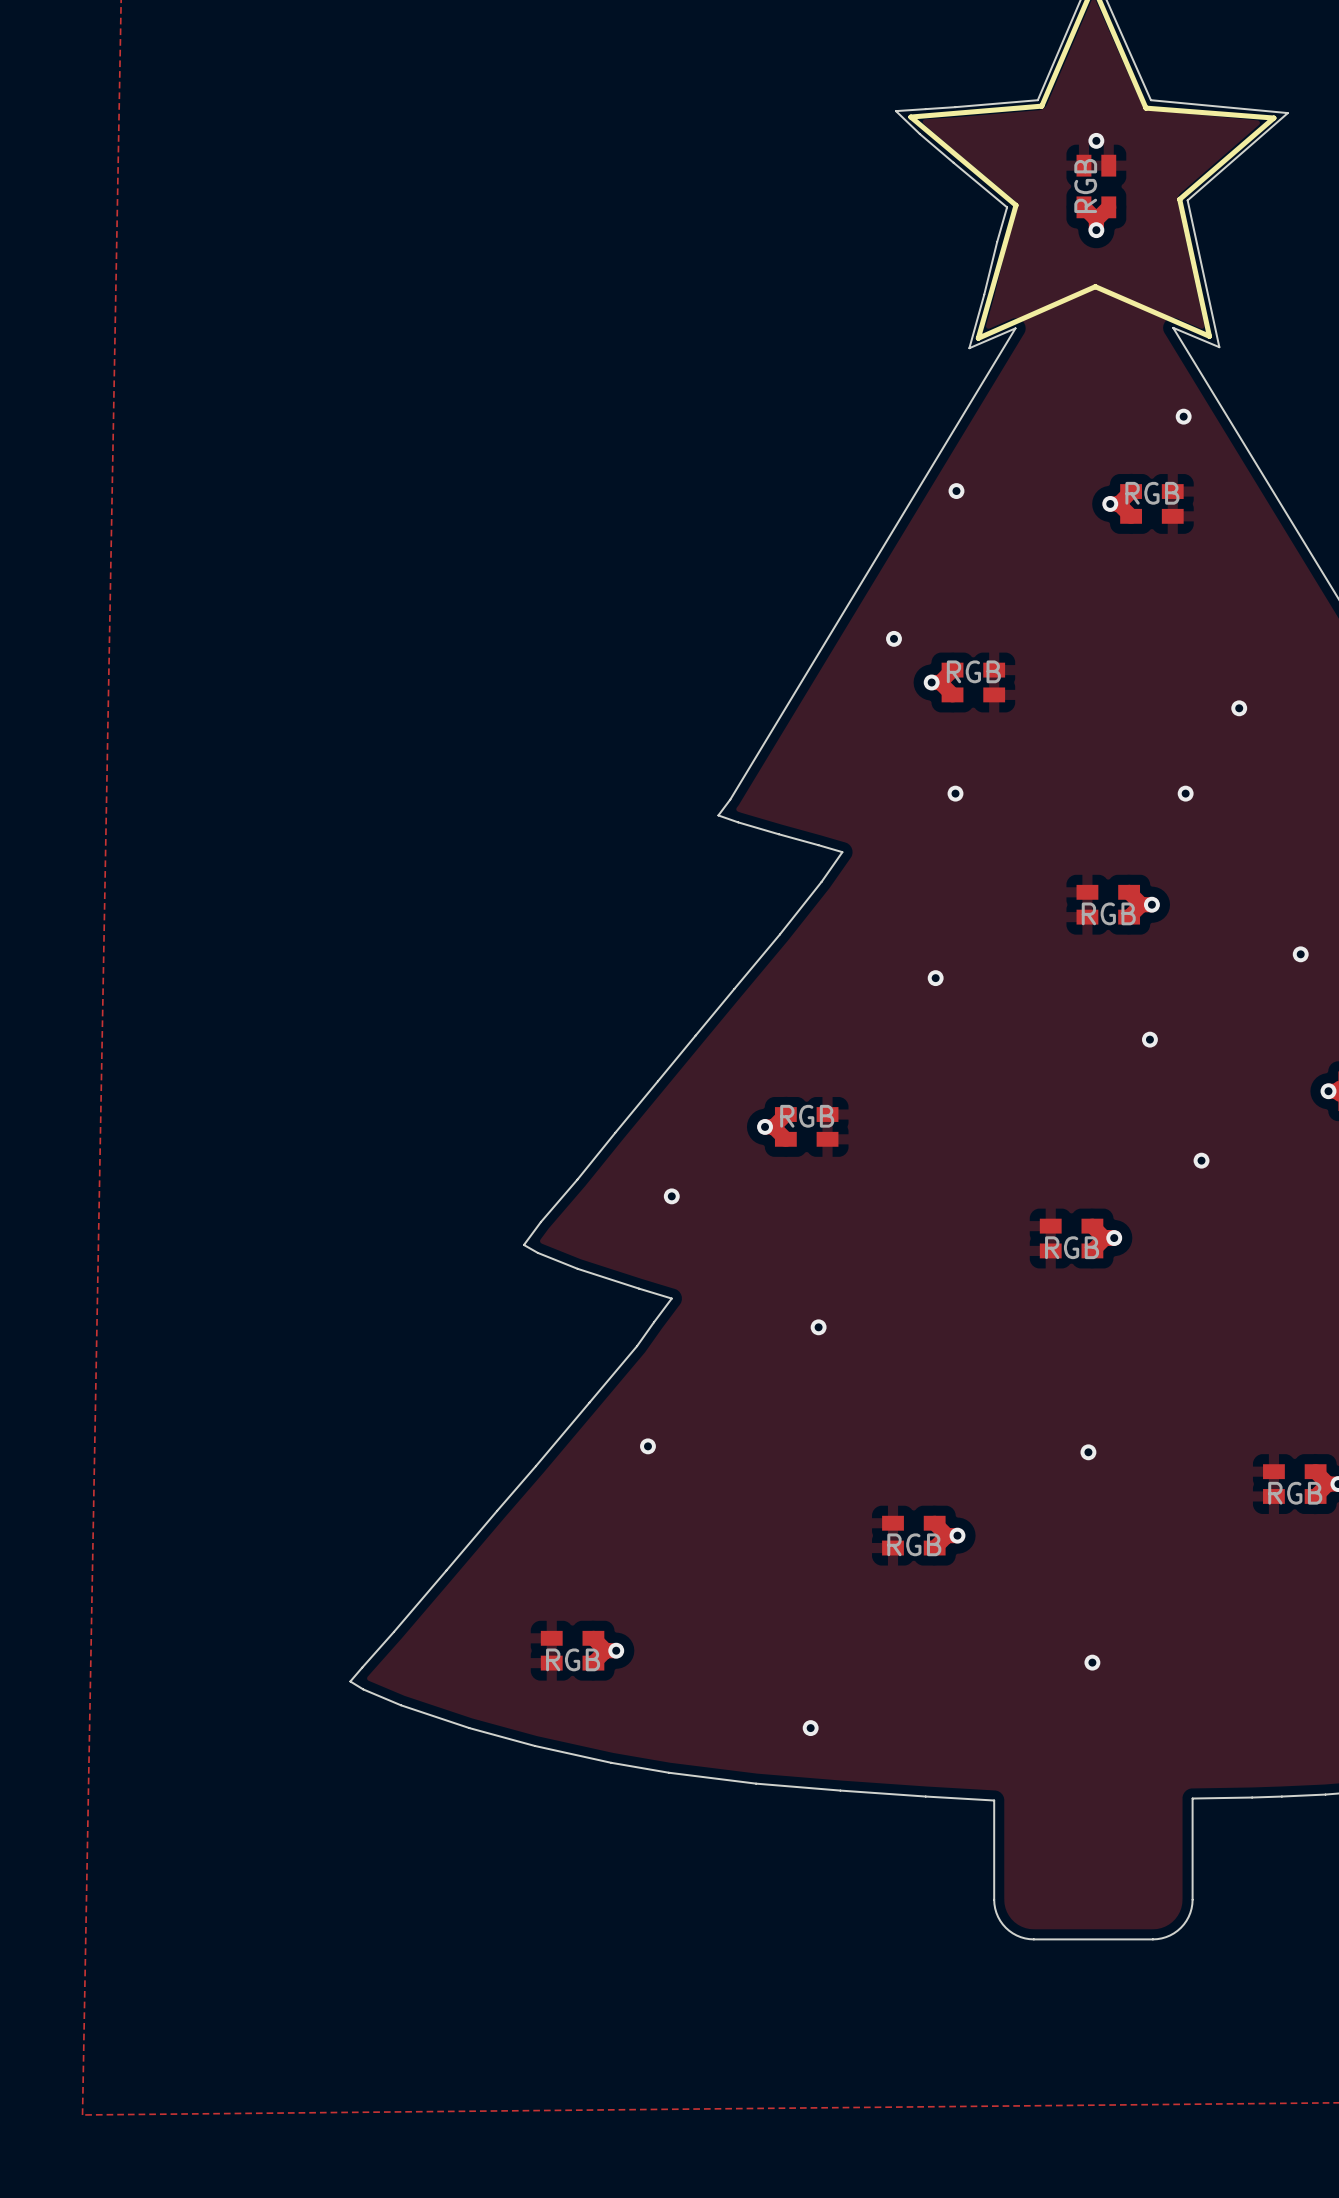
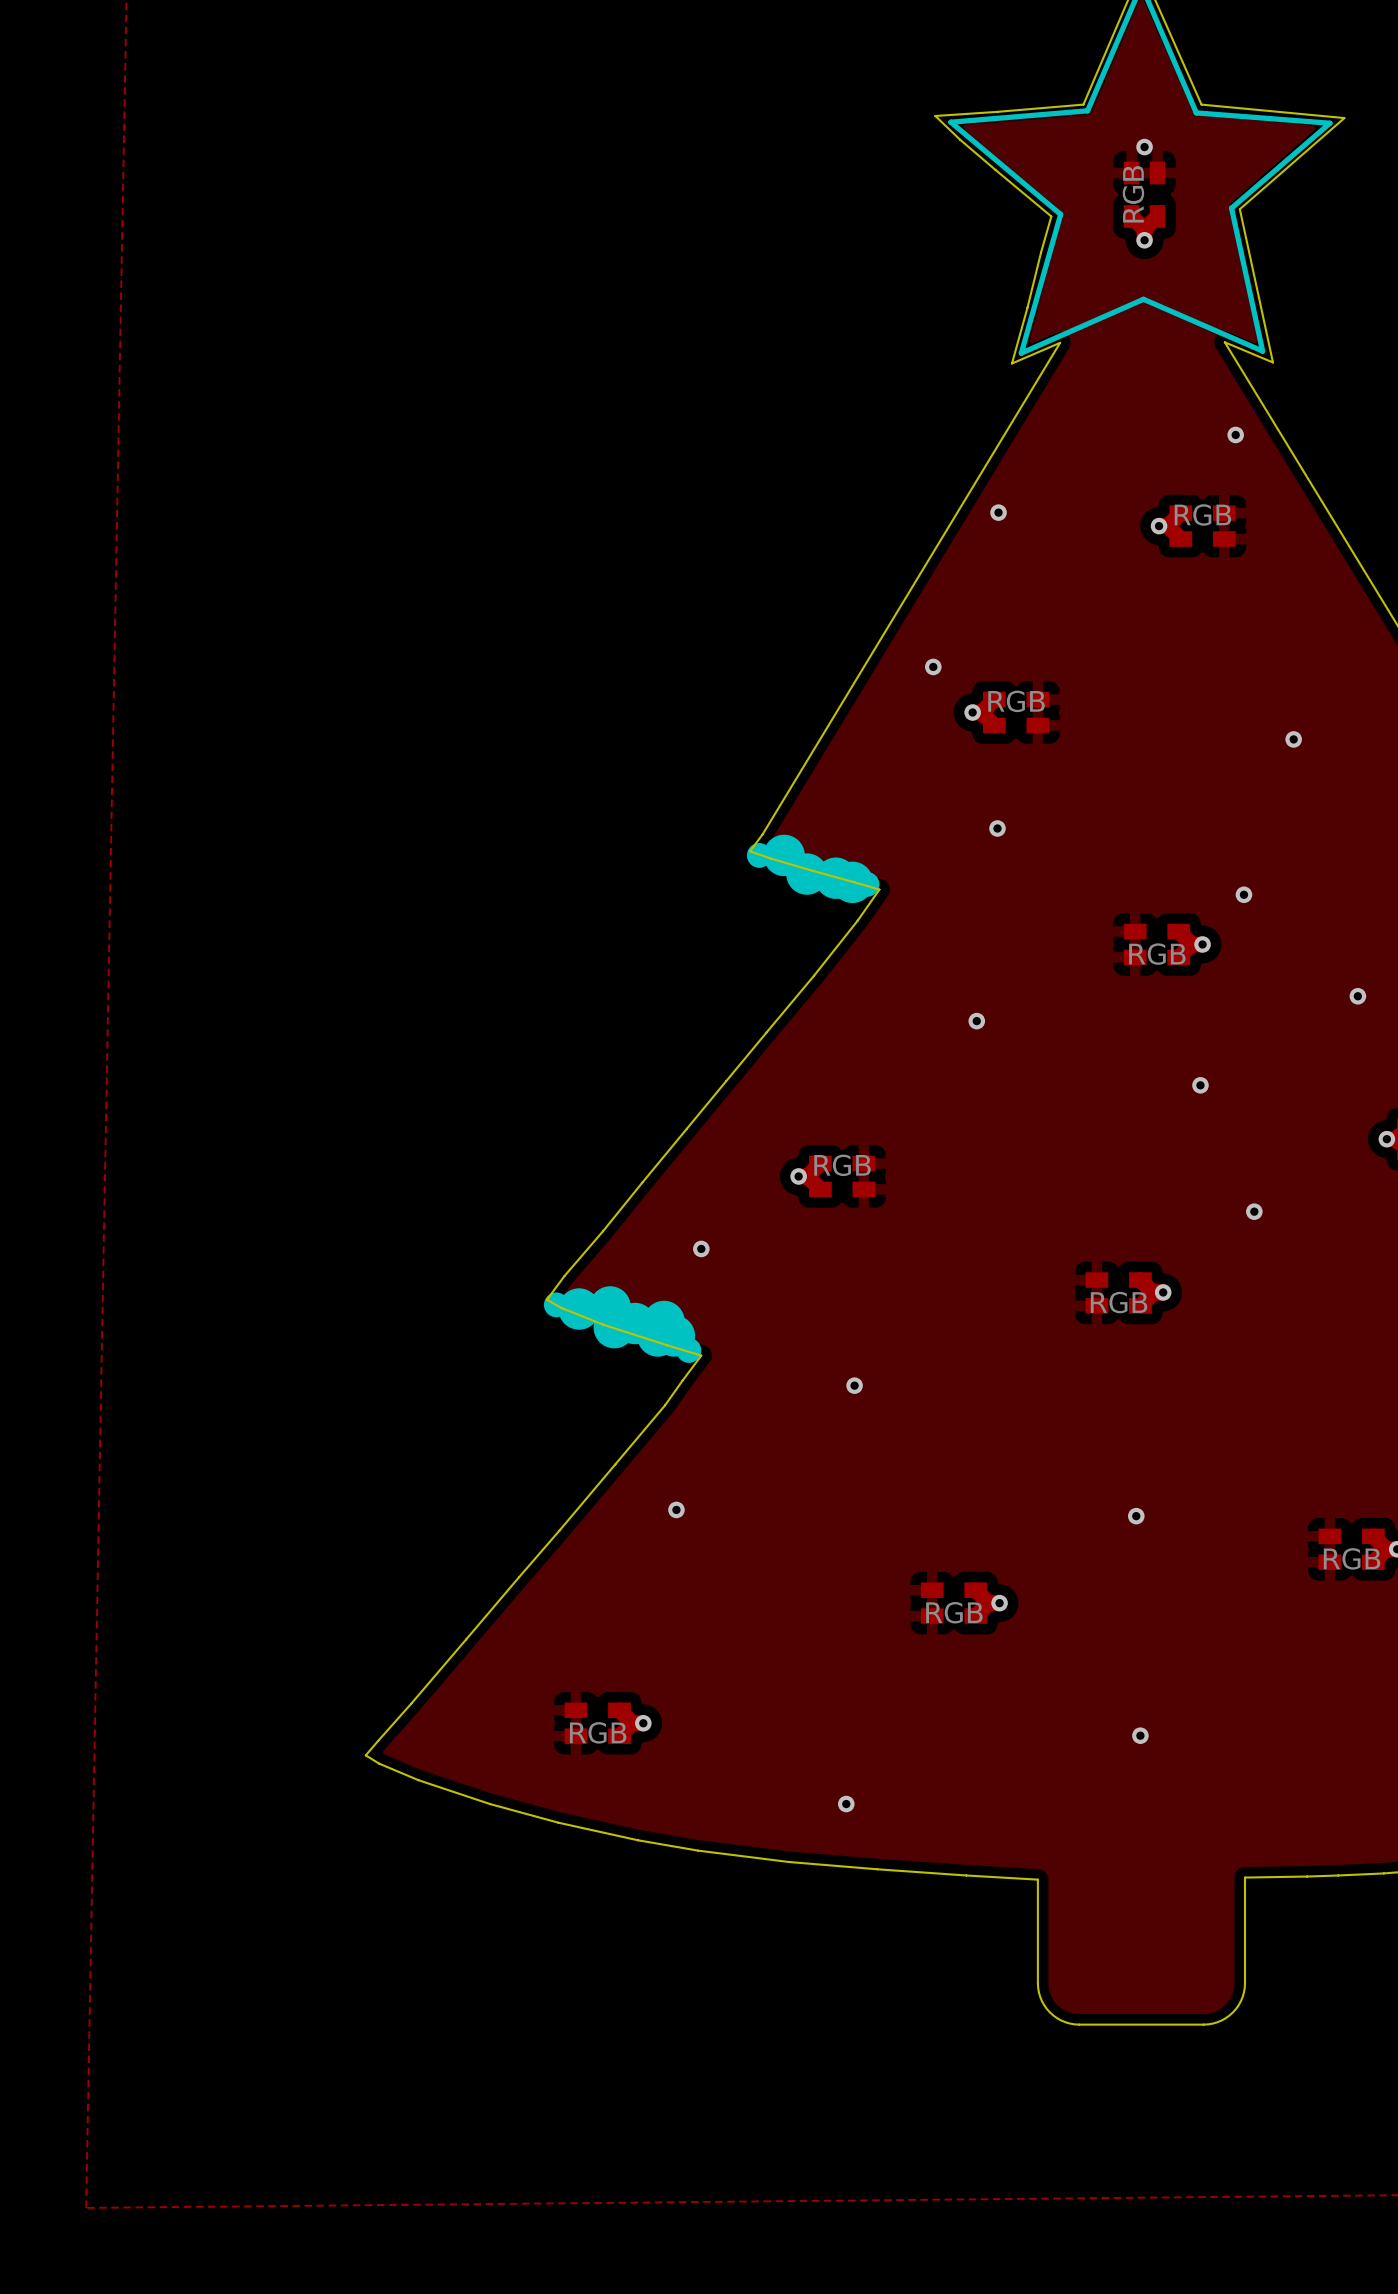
via position: (1185, 793) -> (1243, 894)
drawing: none -> [746, 834, 880, 904]
drawing: none -> [543, 1286, 702, 1363]

